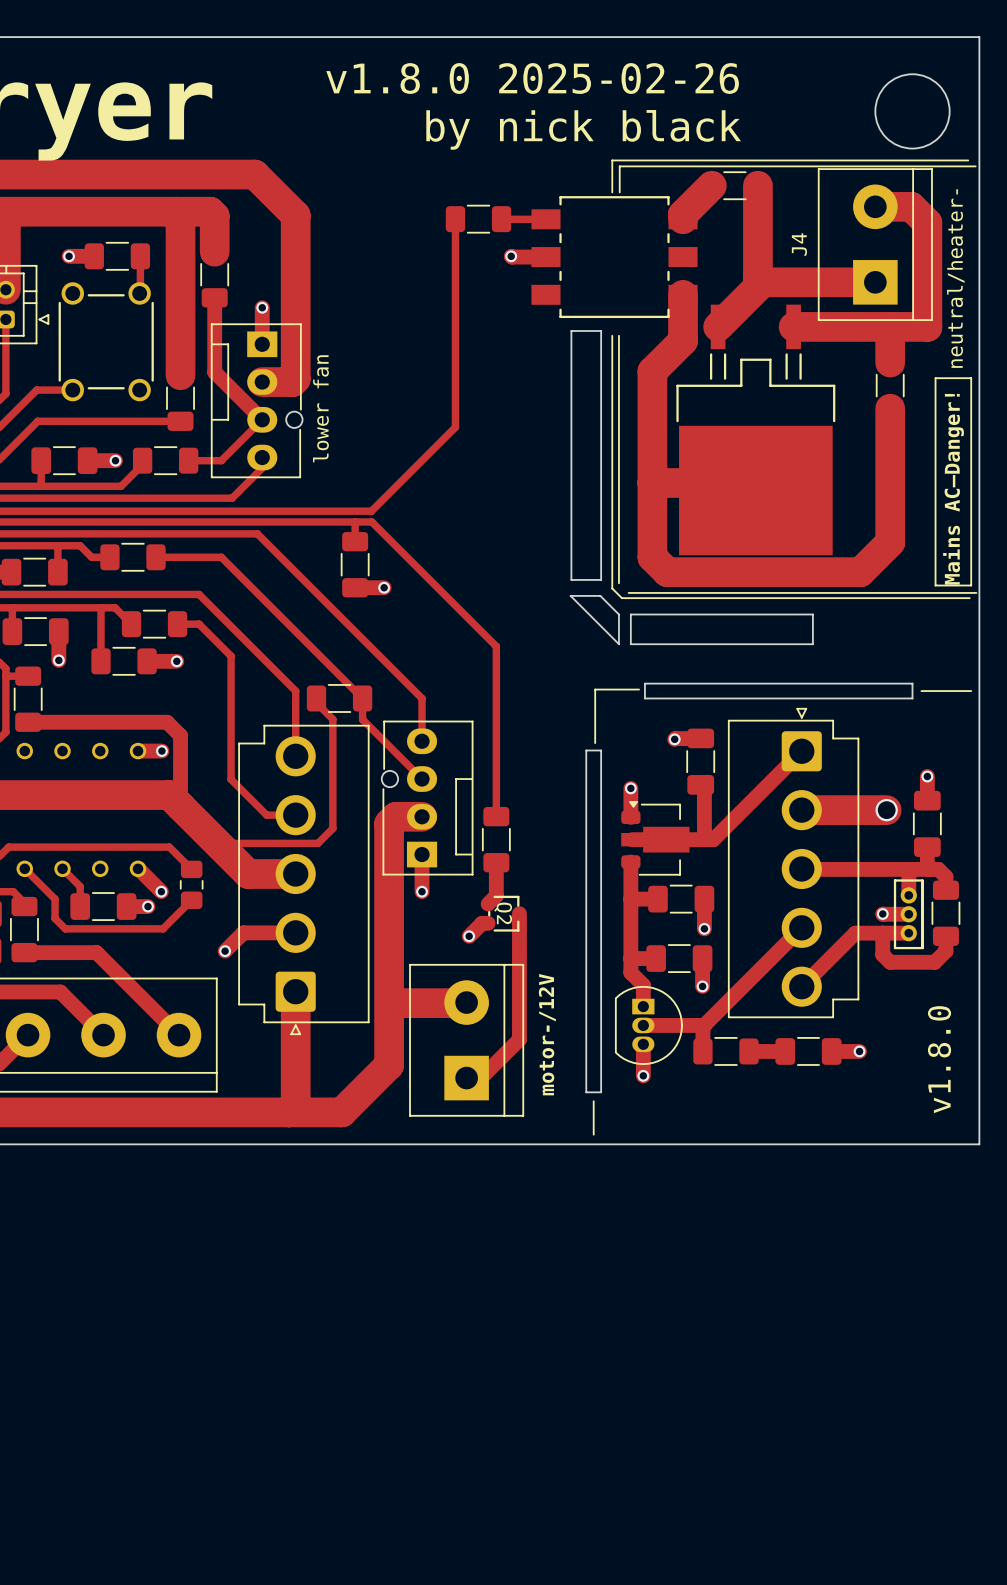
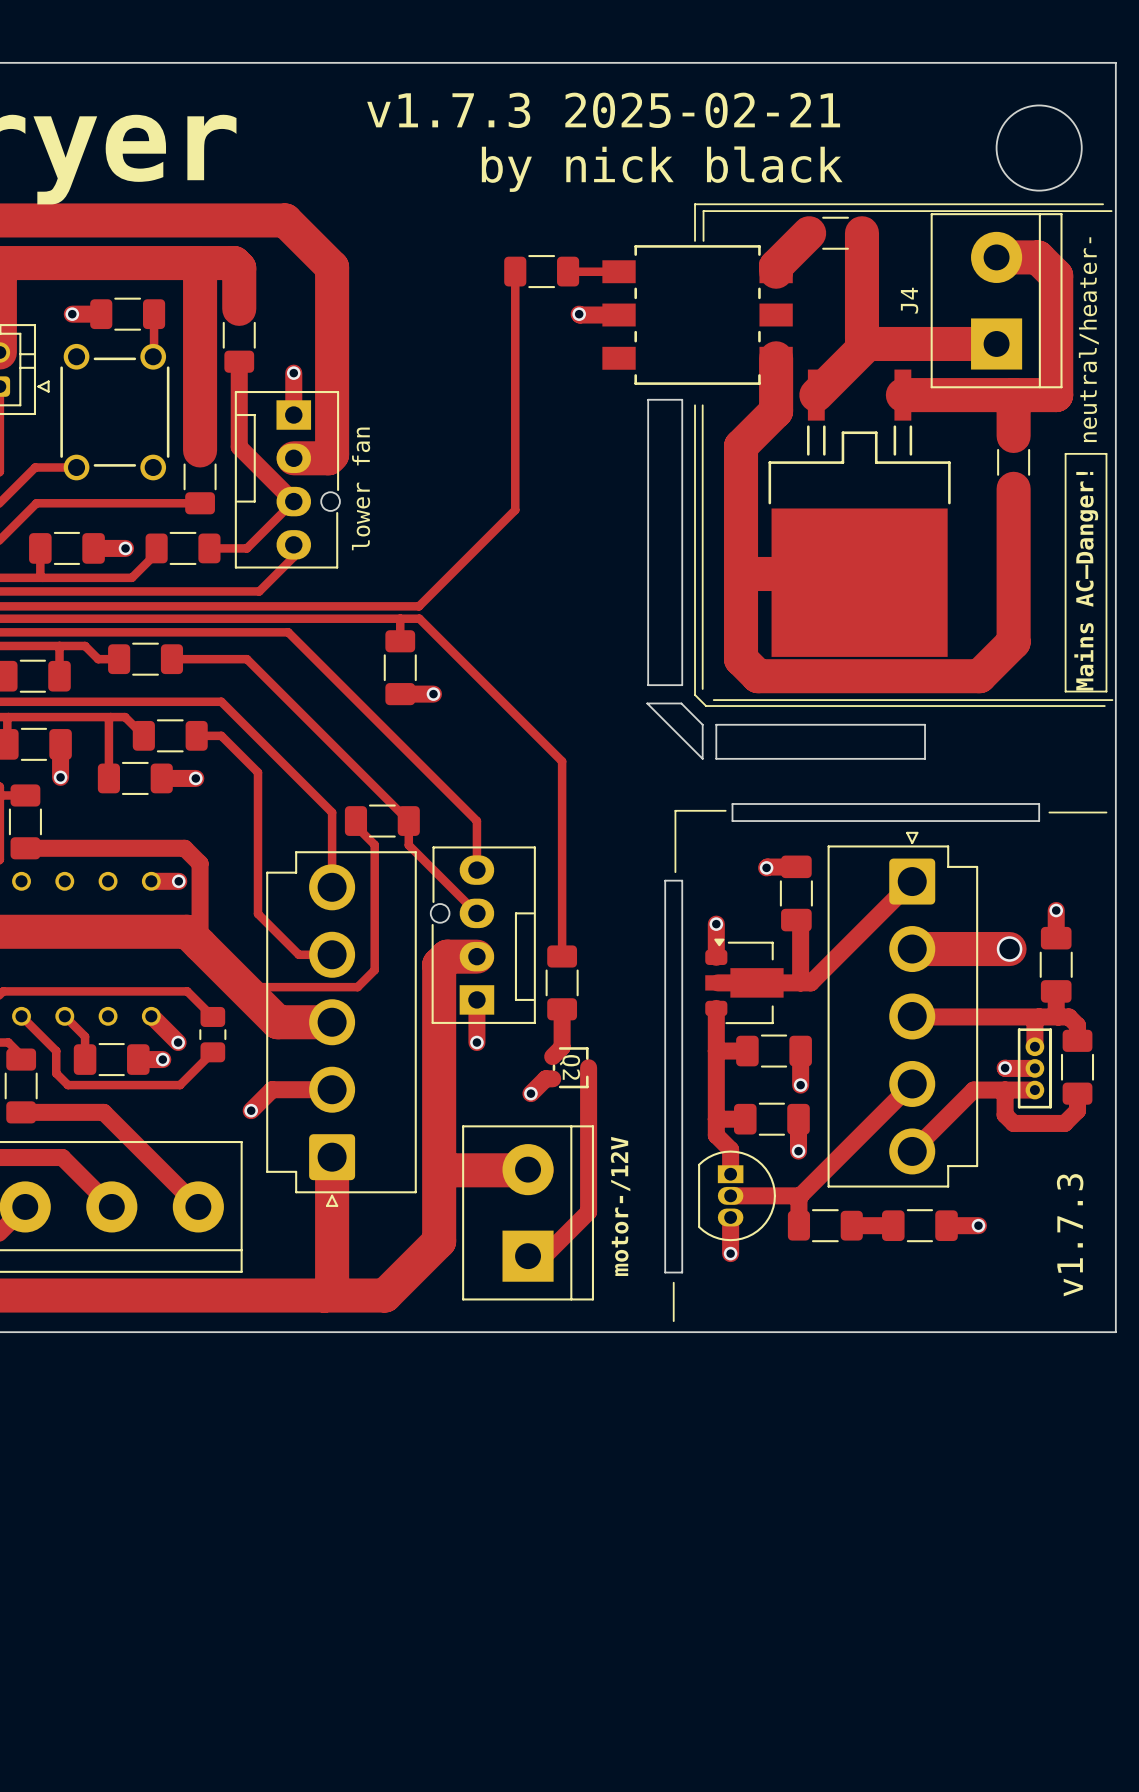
text: v1.8.0 2025-02-26 (532, 78) -> v1.7.3 2025-02-21 (603, 110)
text: v1.8.0 (939, 1059) -> v1.7.3 (1070, 1235)

